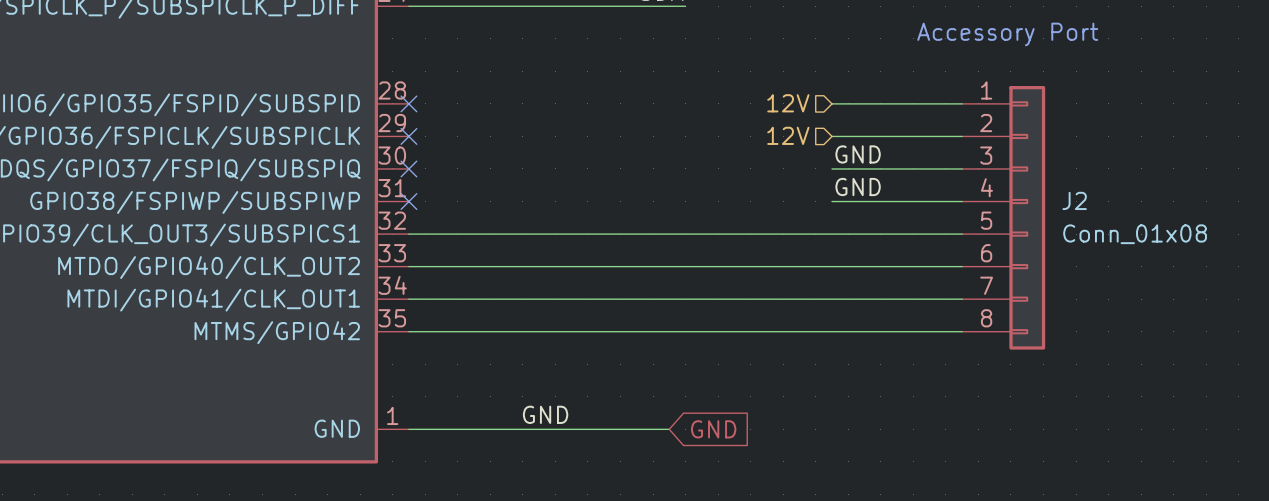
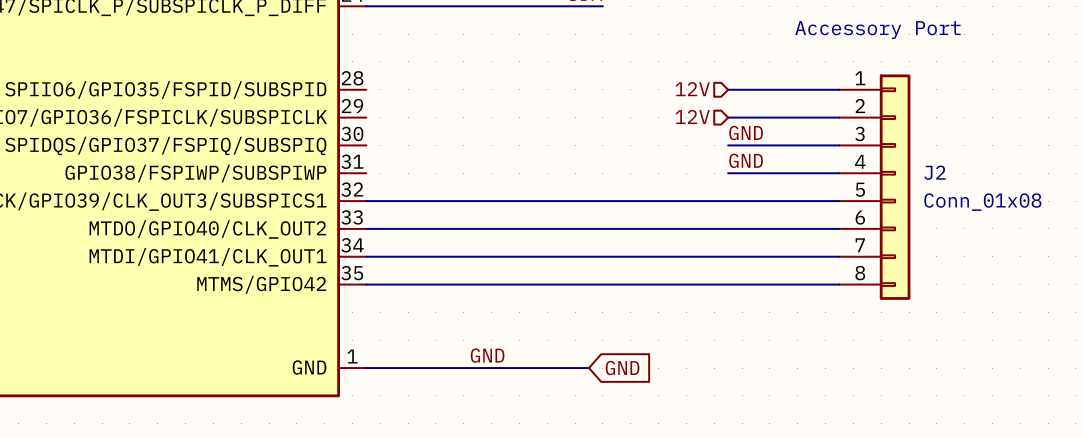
no-connect mark: (408, 103) -> none
no-connect mark: (408, 136) -> none
no-connect mark: (408, 168) -> none
no-connect mark: (408, 201) -> none

